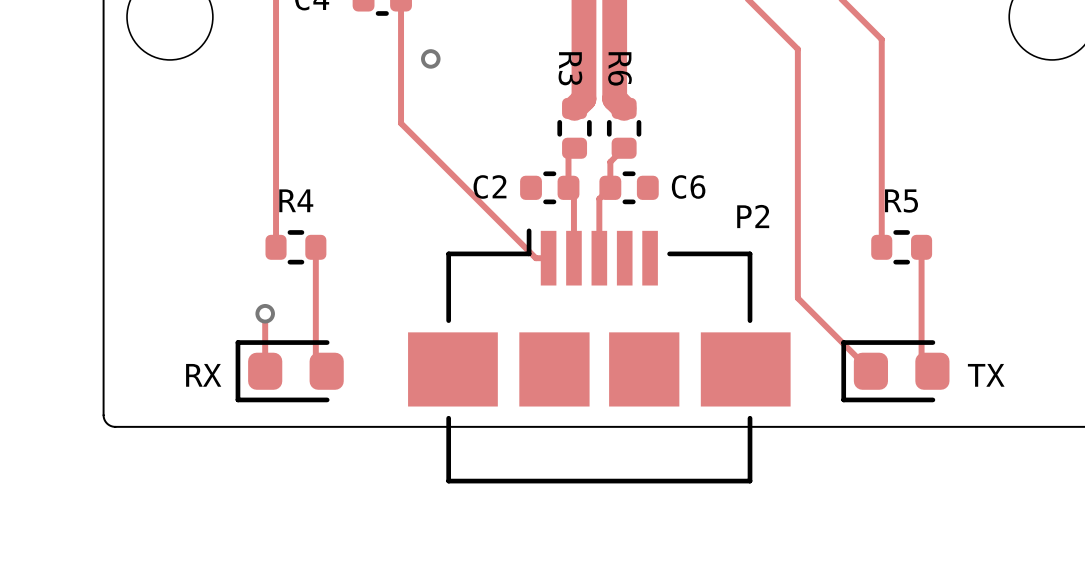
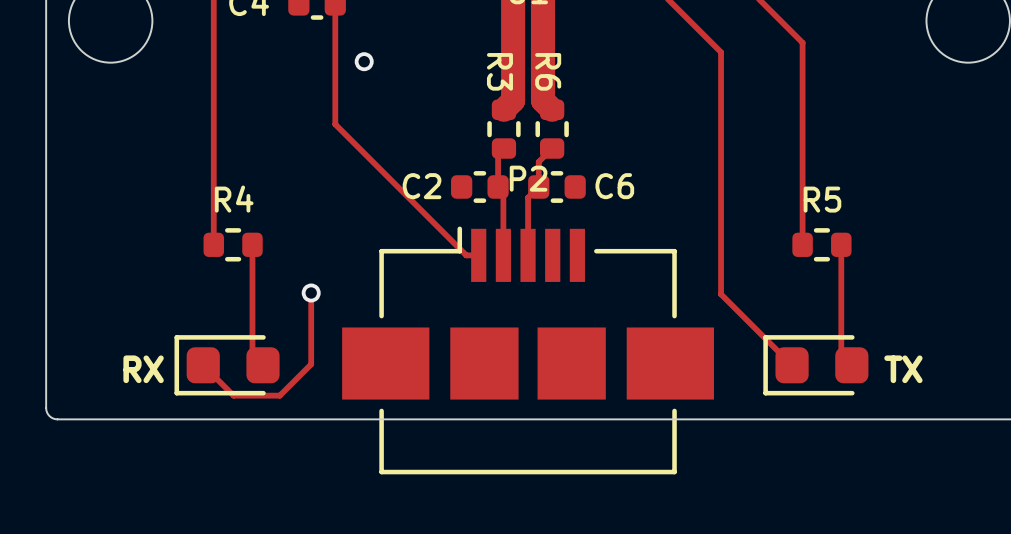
P2 name position: P2 (753, 216) -> P2 (528, 178)
track: (265, 313) (265, 371) -> (311, 293) (311, 364) (279, 395) (233, 395) (203, 365)
via position: (265, 313) -> (311, 293)

